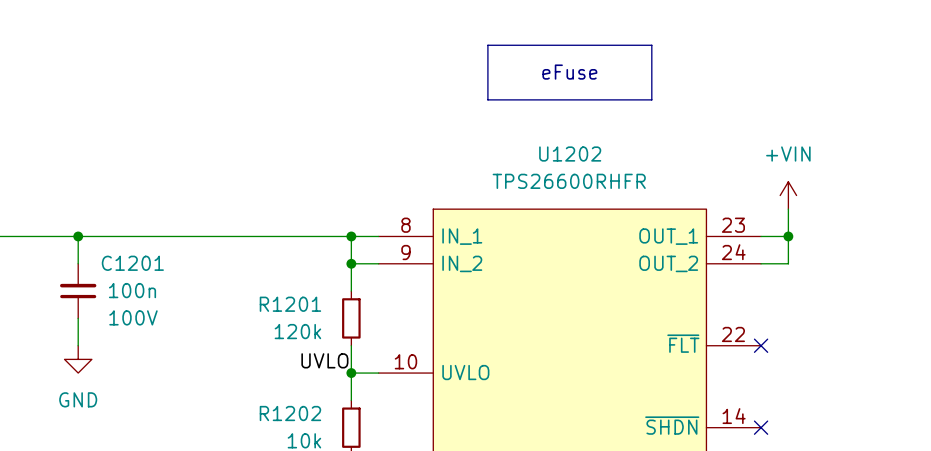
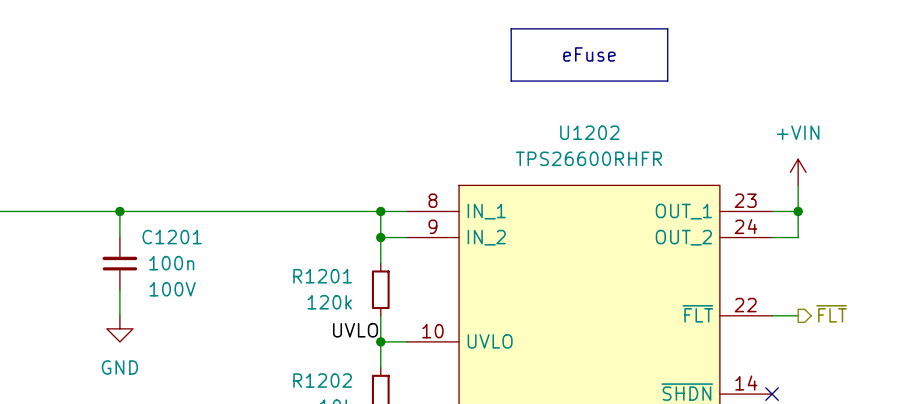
hierarchical label: none -> ~{FLT} (831, 313)
wire: none -> (772, 315) (798, 315)
no-connect mark: (761, 345) -> none

